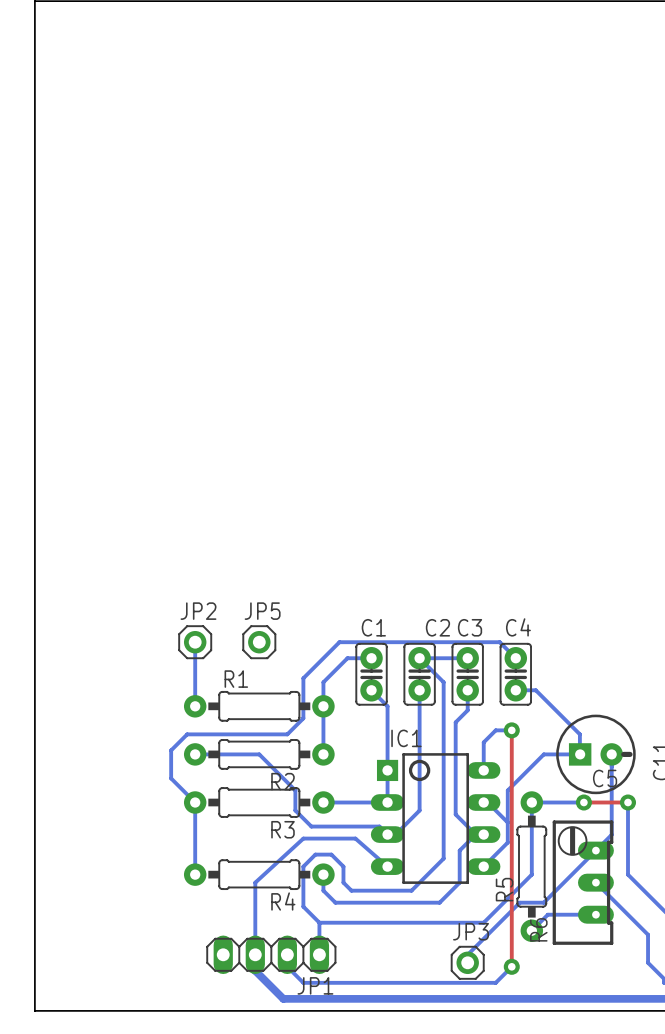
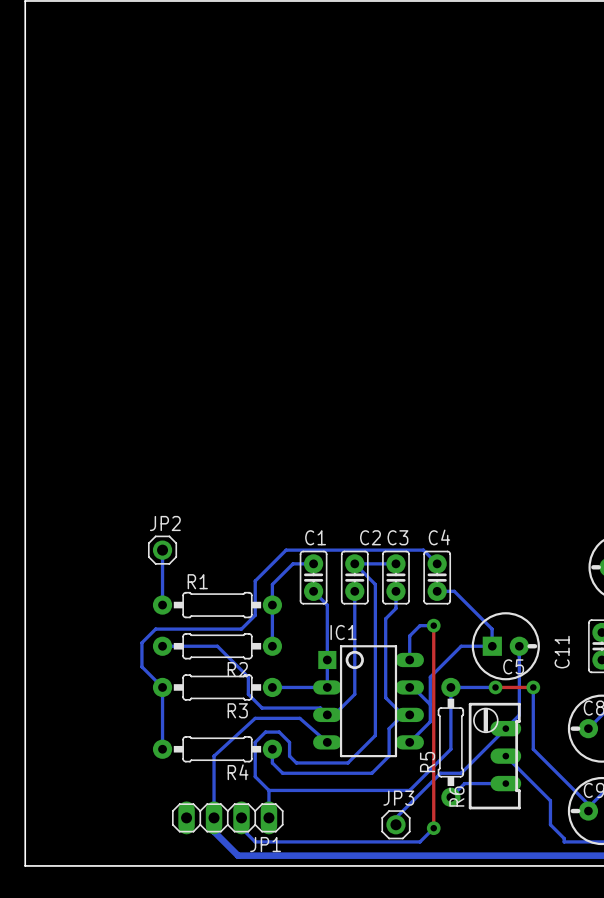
JP5: (259, 642) -> none

